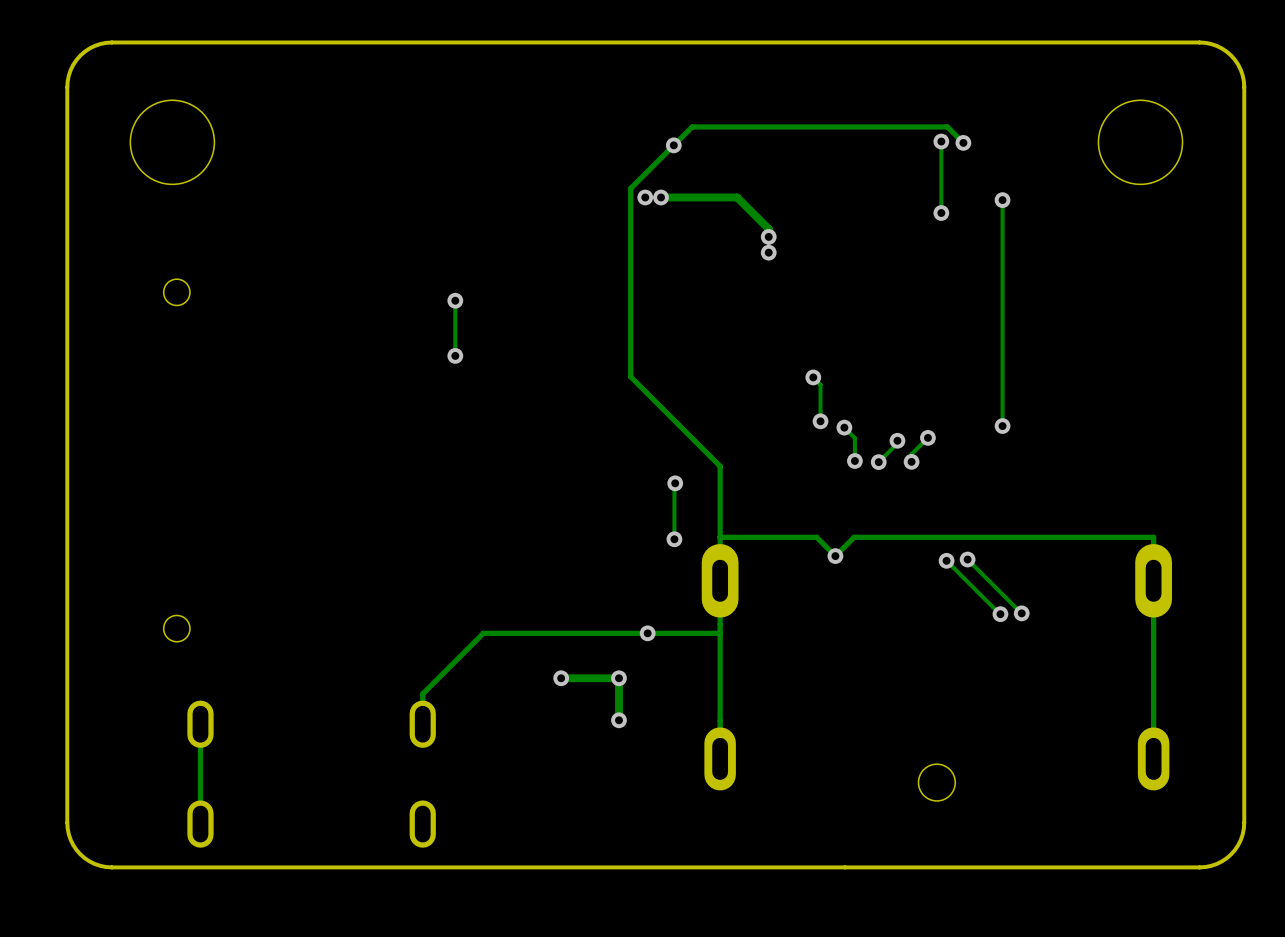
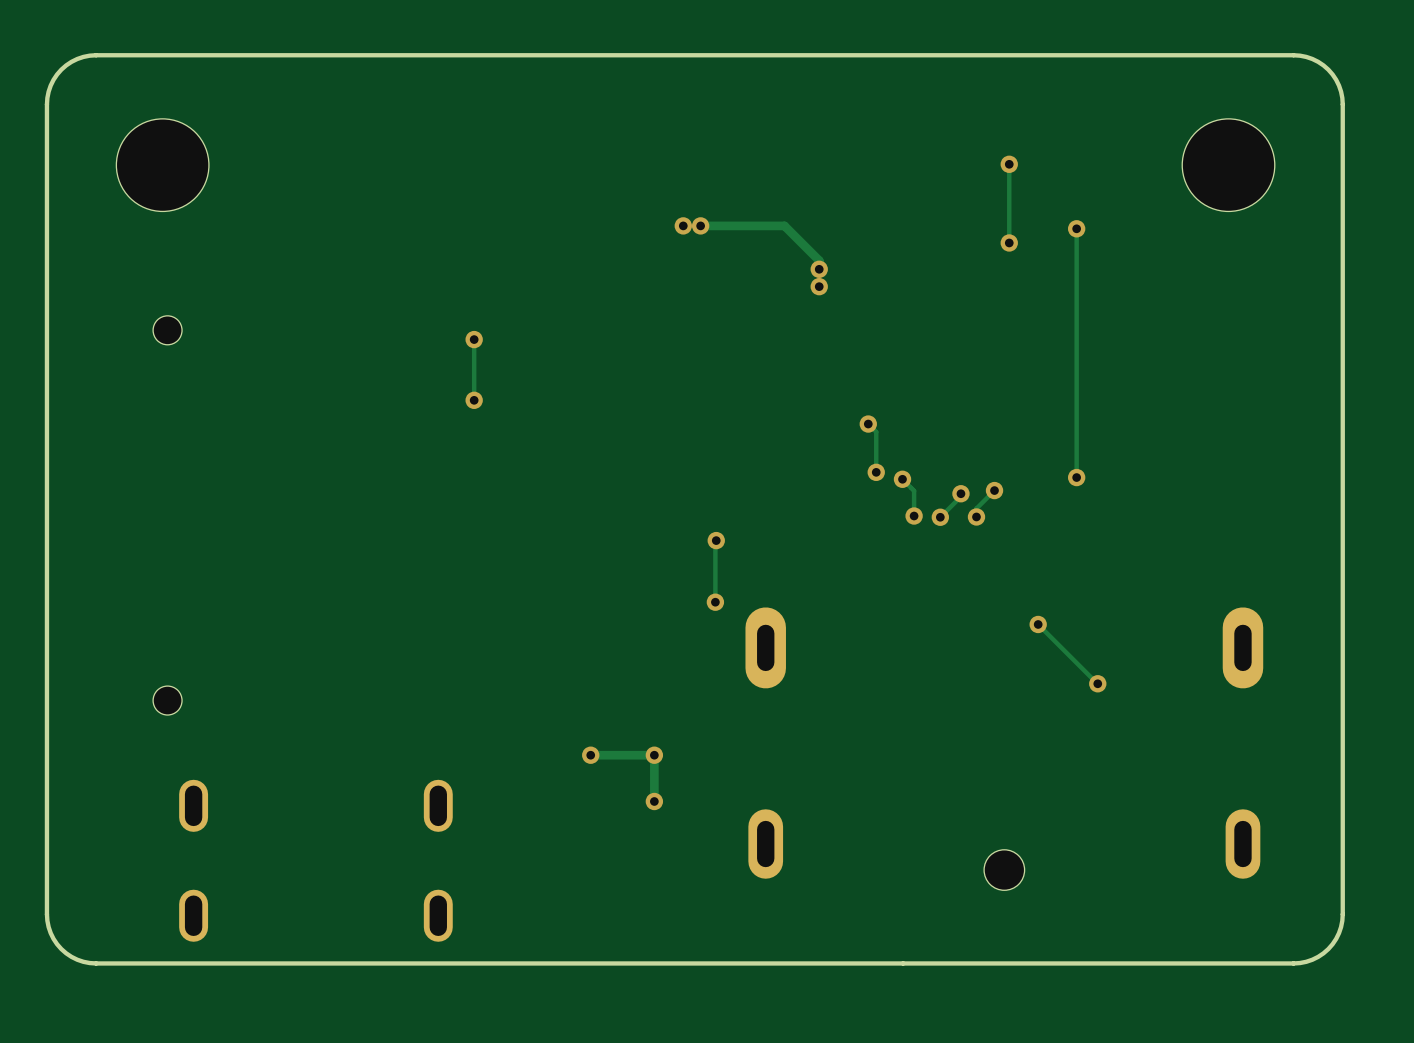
track: (963, 142) (947, 126) (692, 126) (630, 188) (630, 376) (720, 466) (720, 758) -> none
via: (963, 142) -> none
via: (673, 145) -> none
track: (720, 537) (816, 537) (835, 556) (854, 537) (1153, 537) (1153, 758) -> none
via: (835, 556) -> none
track: (946, 560) (999, 614) -> none
via: (946, 560) -> none
via: (1000, 614) -> none
via: (647, 633) -> none
track: (720, 633) (483, 633) (422, 693) (422, 724) -> none
track: (200, 724) (200, 824) -> none

